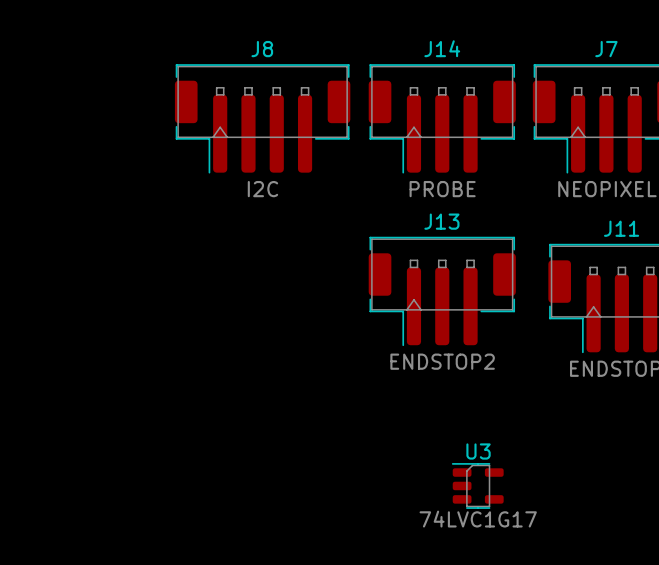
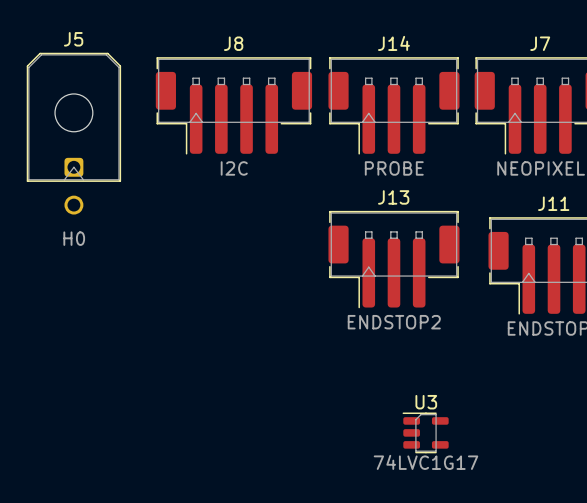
J5: none -> H0 (73, 133)

